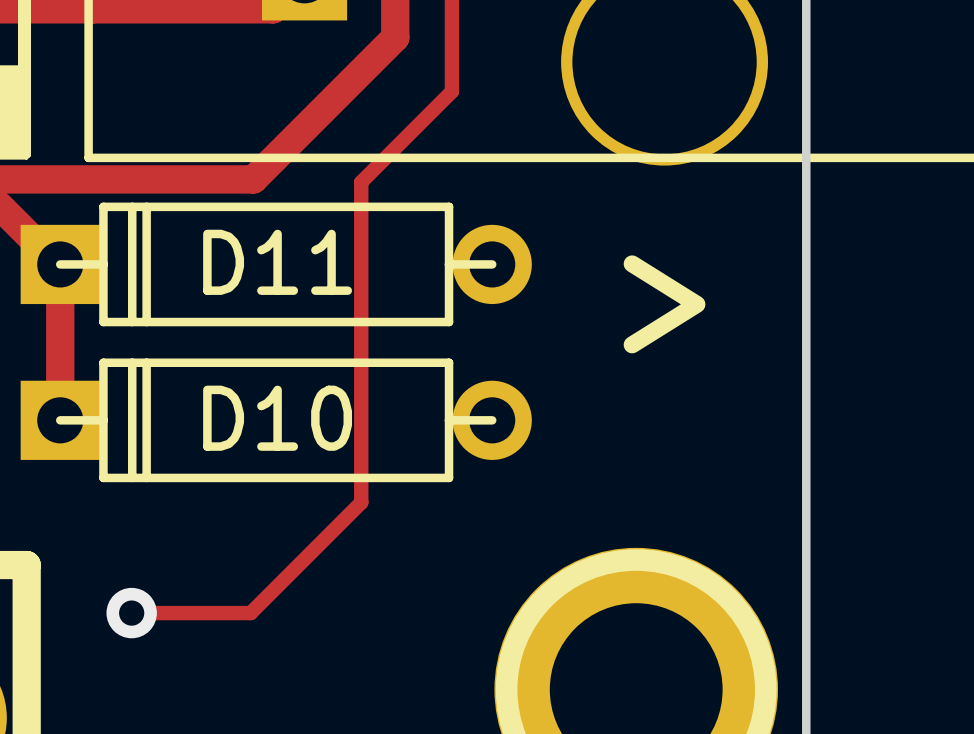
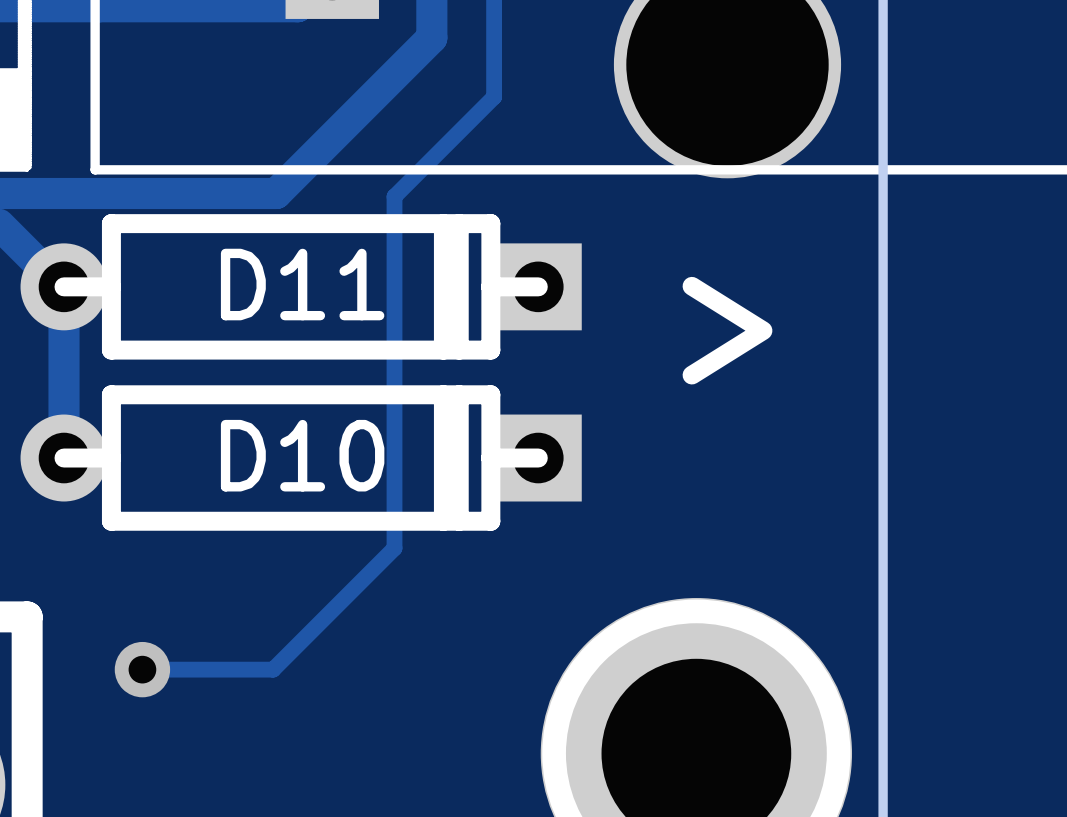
D11 footprint: [20, 202, 532, 327] -> [20, 214, 582, 360]
D10 footprint: [20, 358, 532, 483] -> [20, 385, 582, 531]

